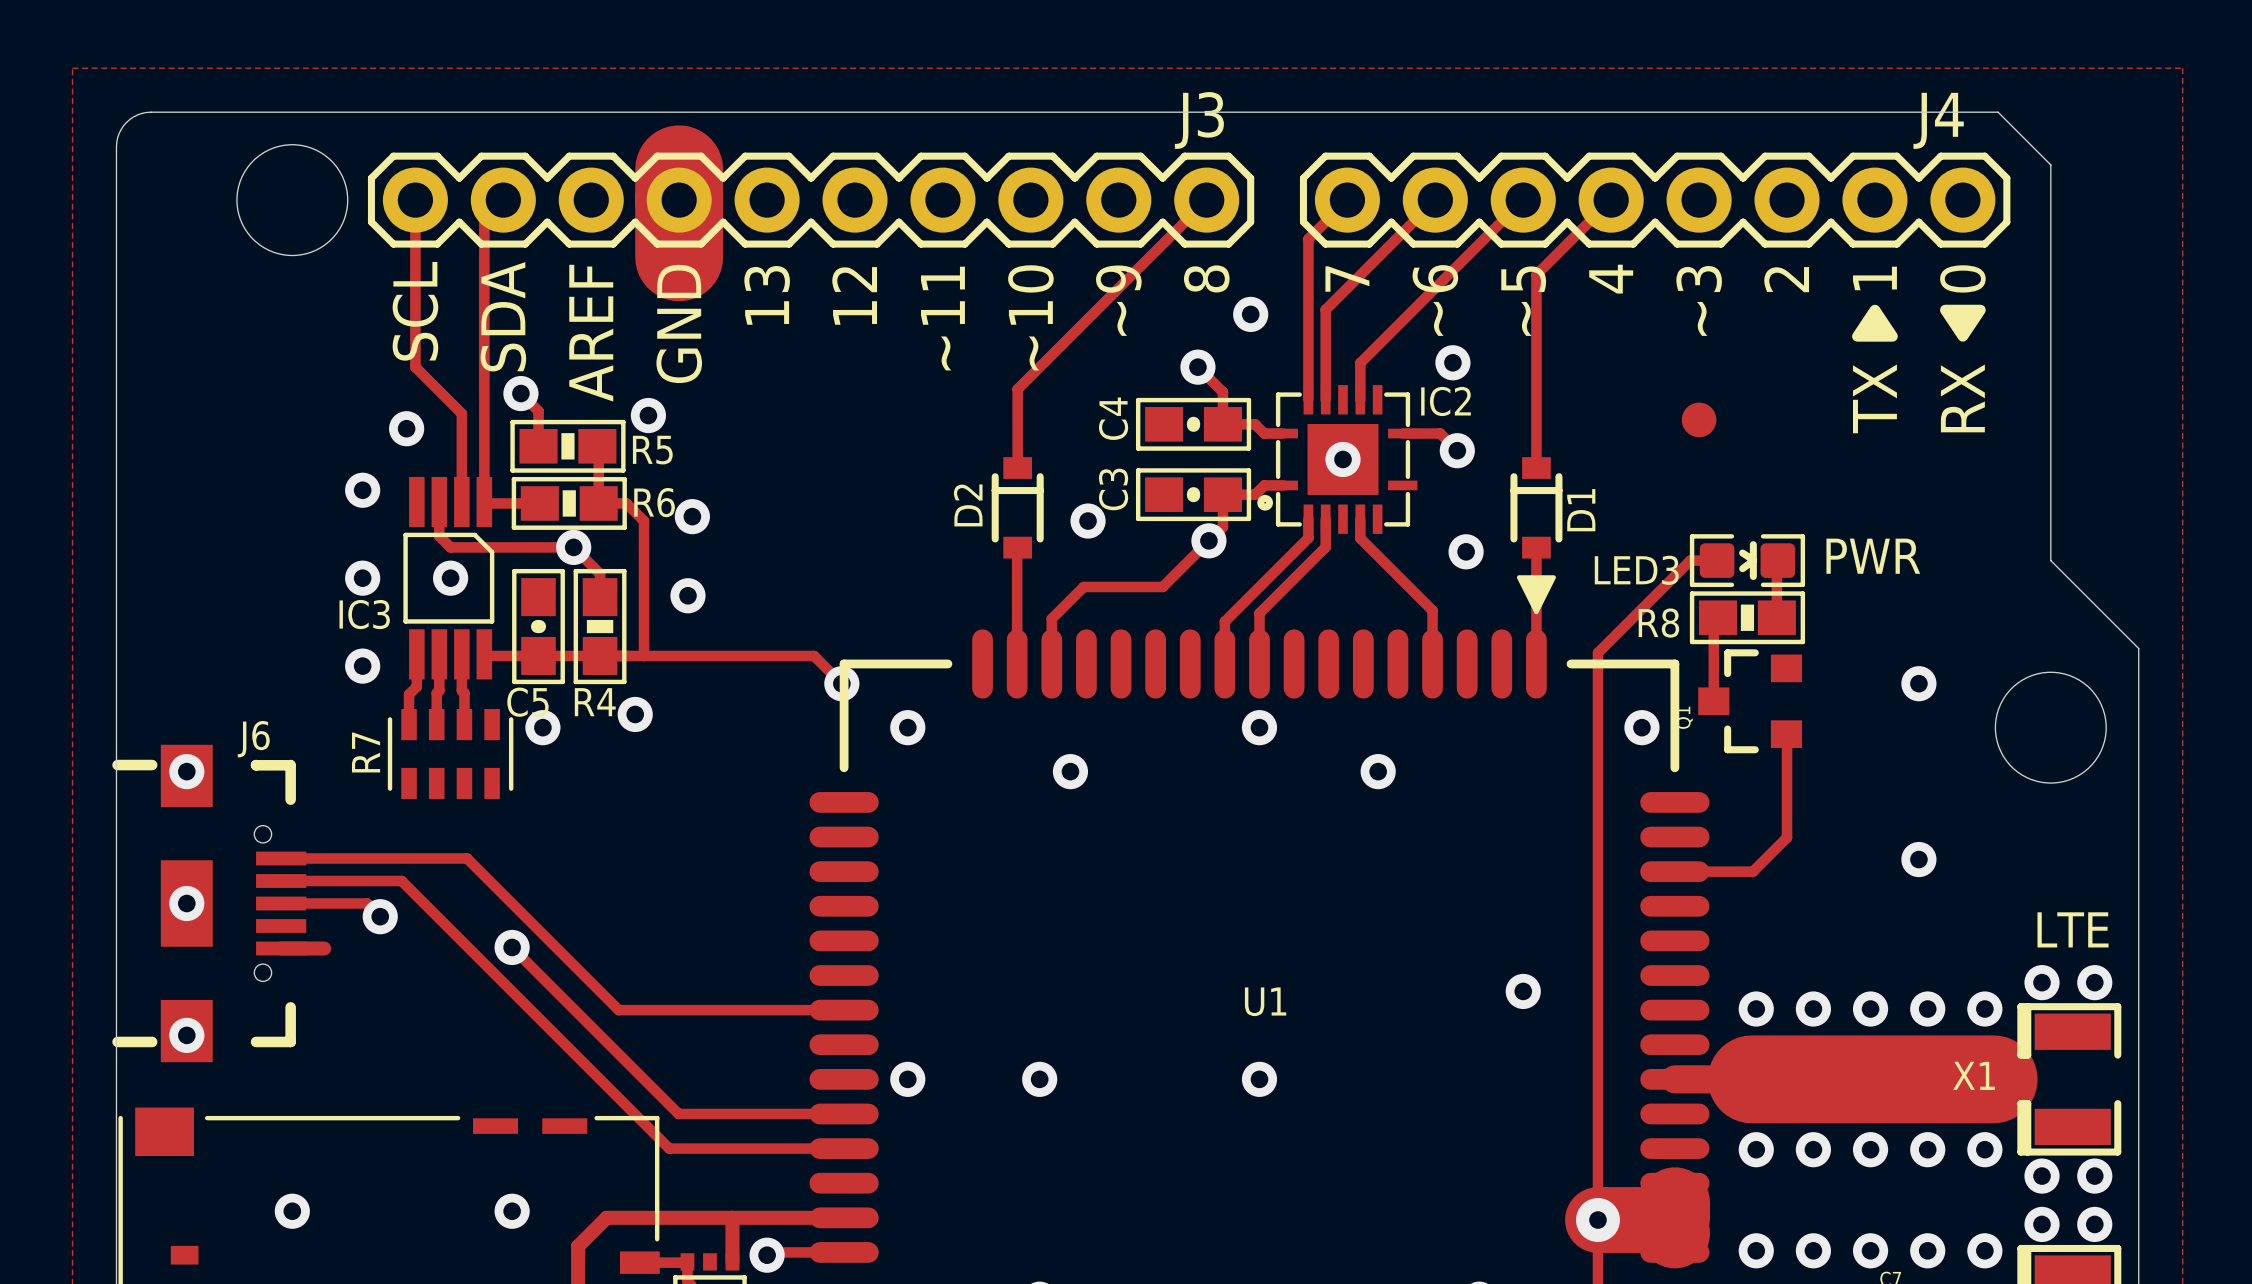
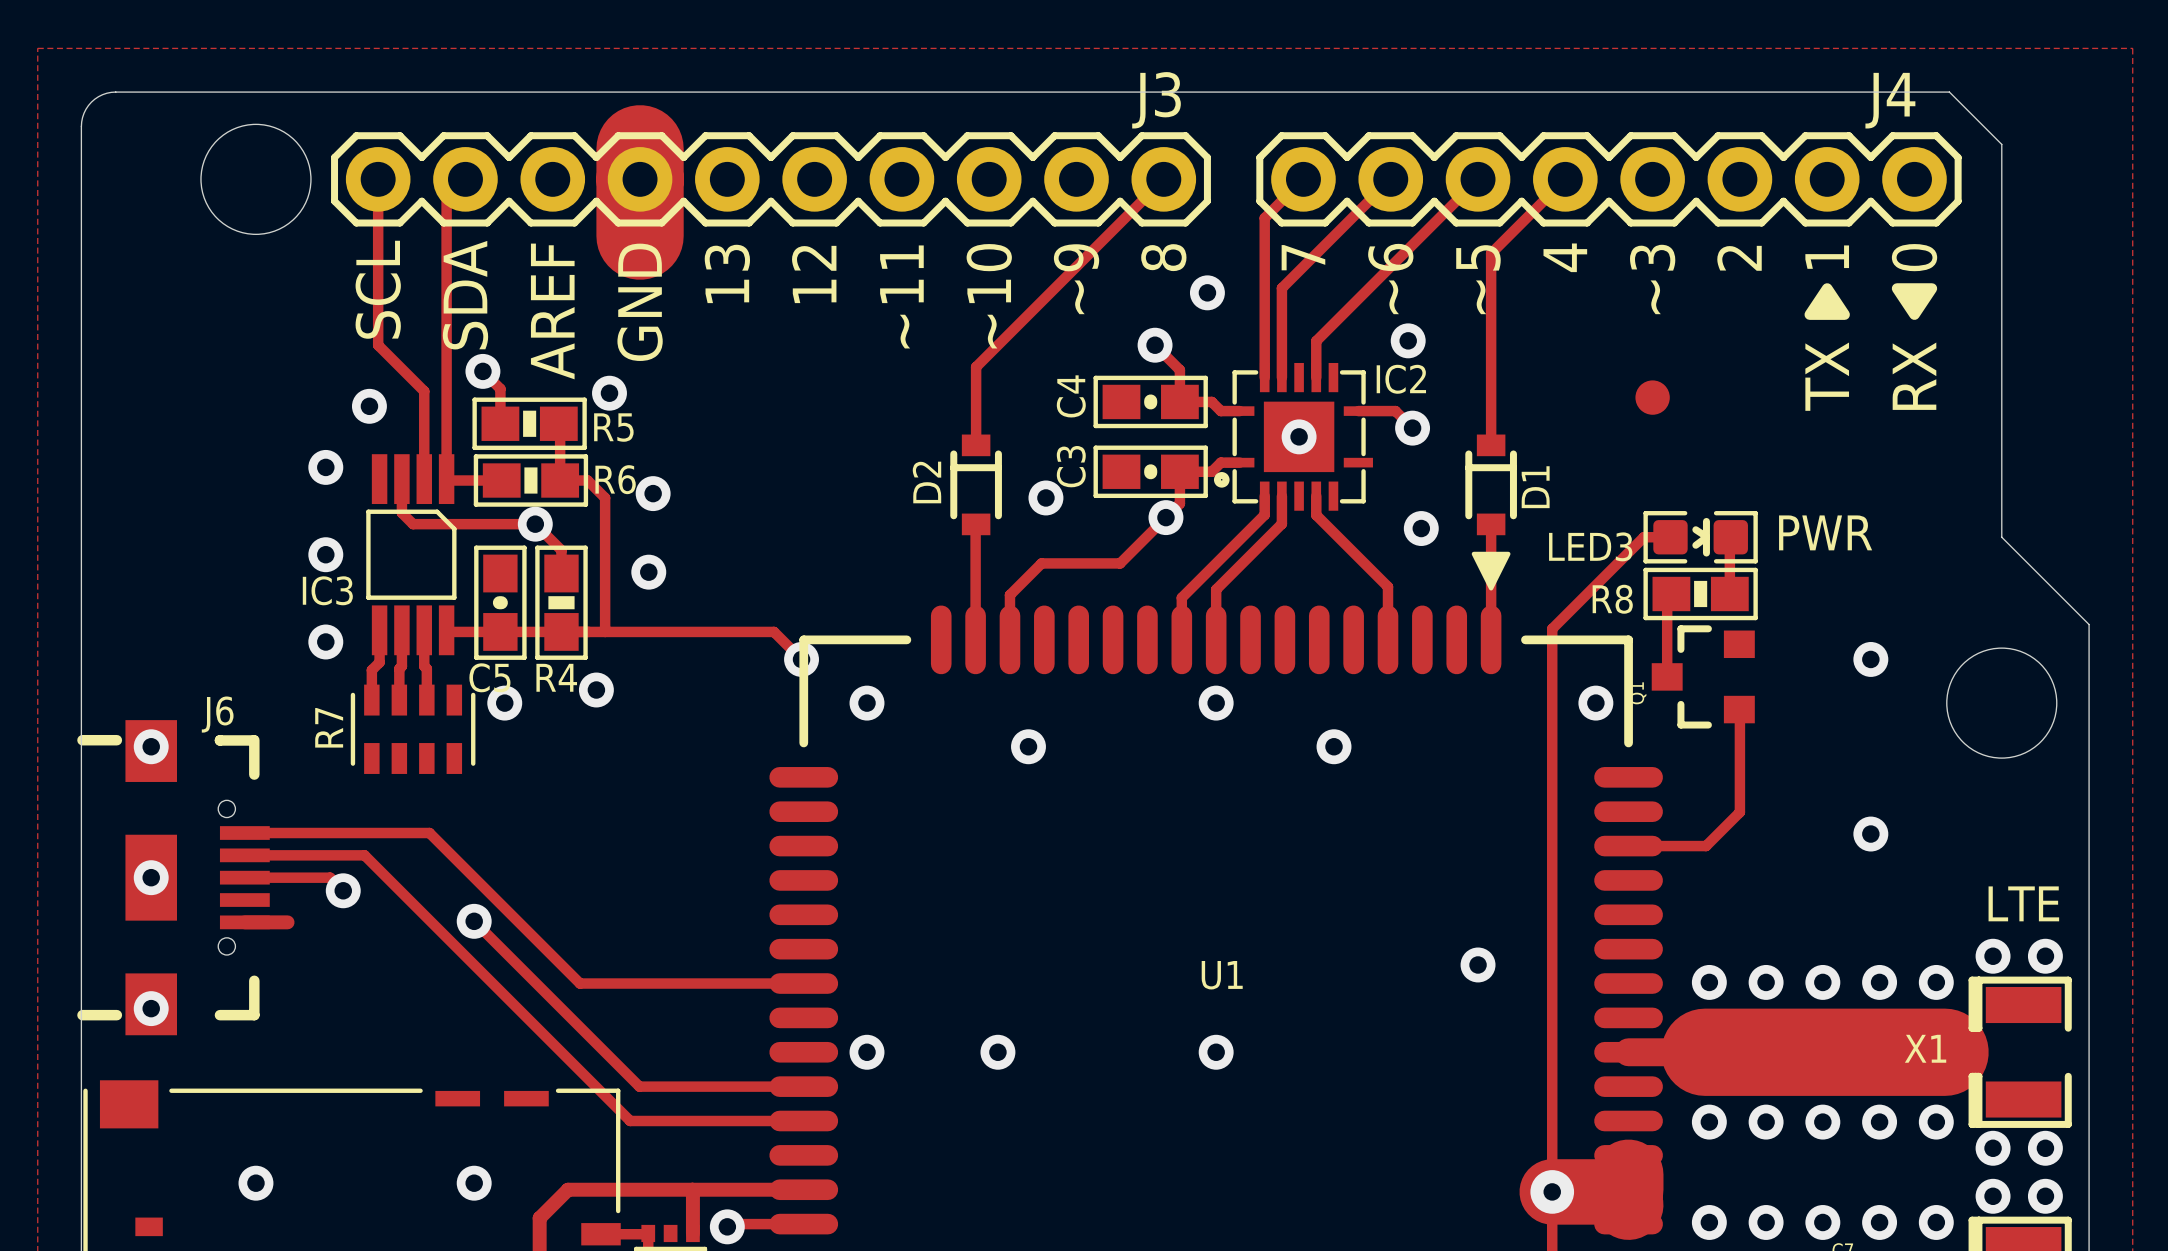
via: (450, 578) -> none

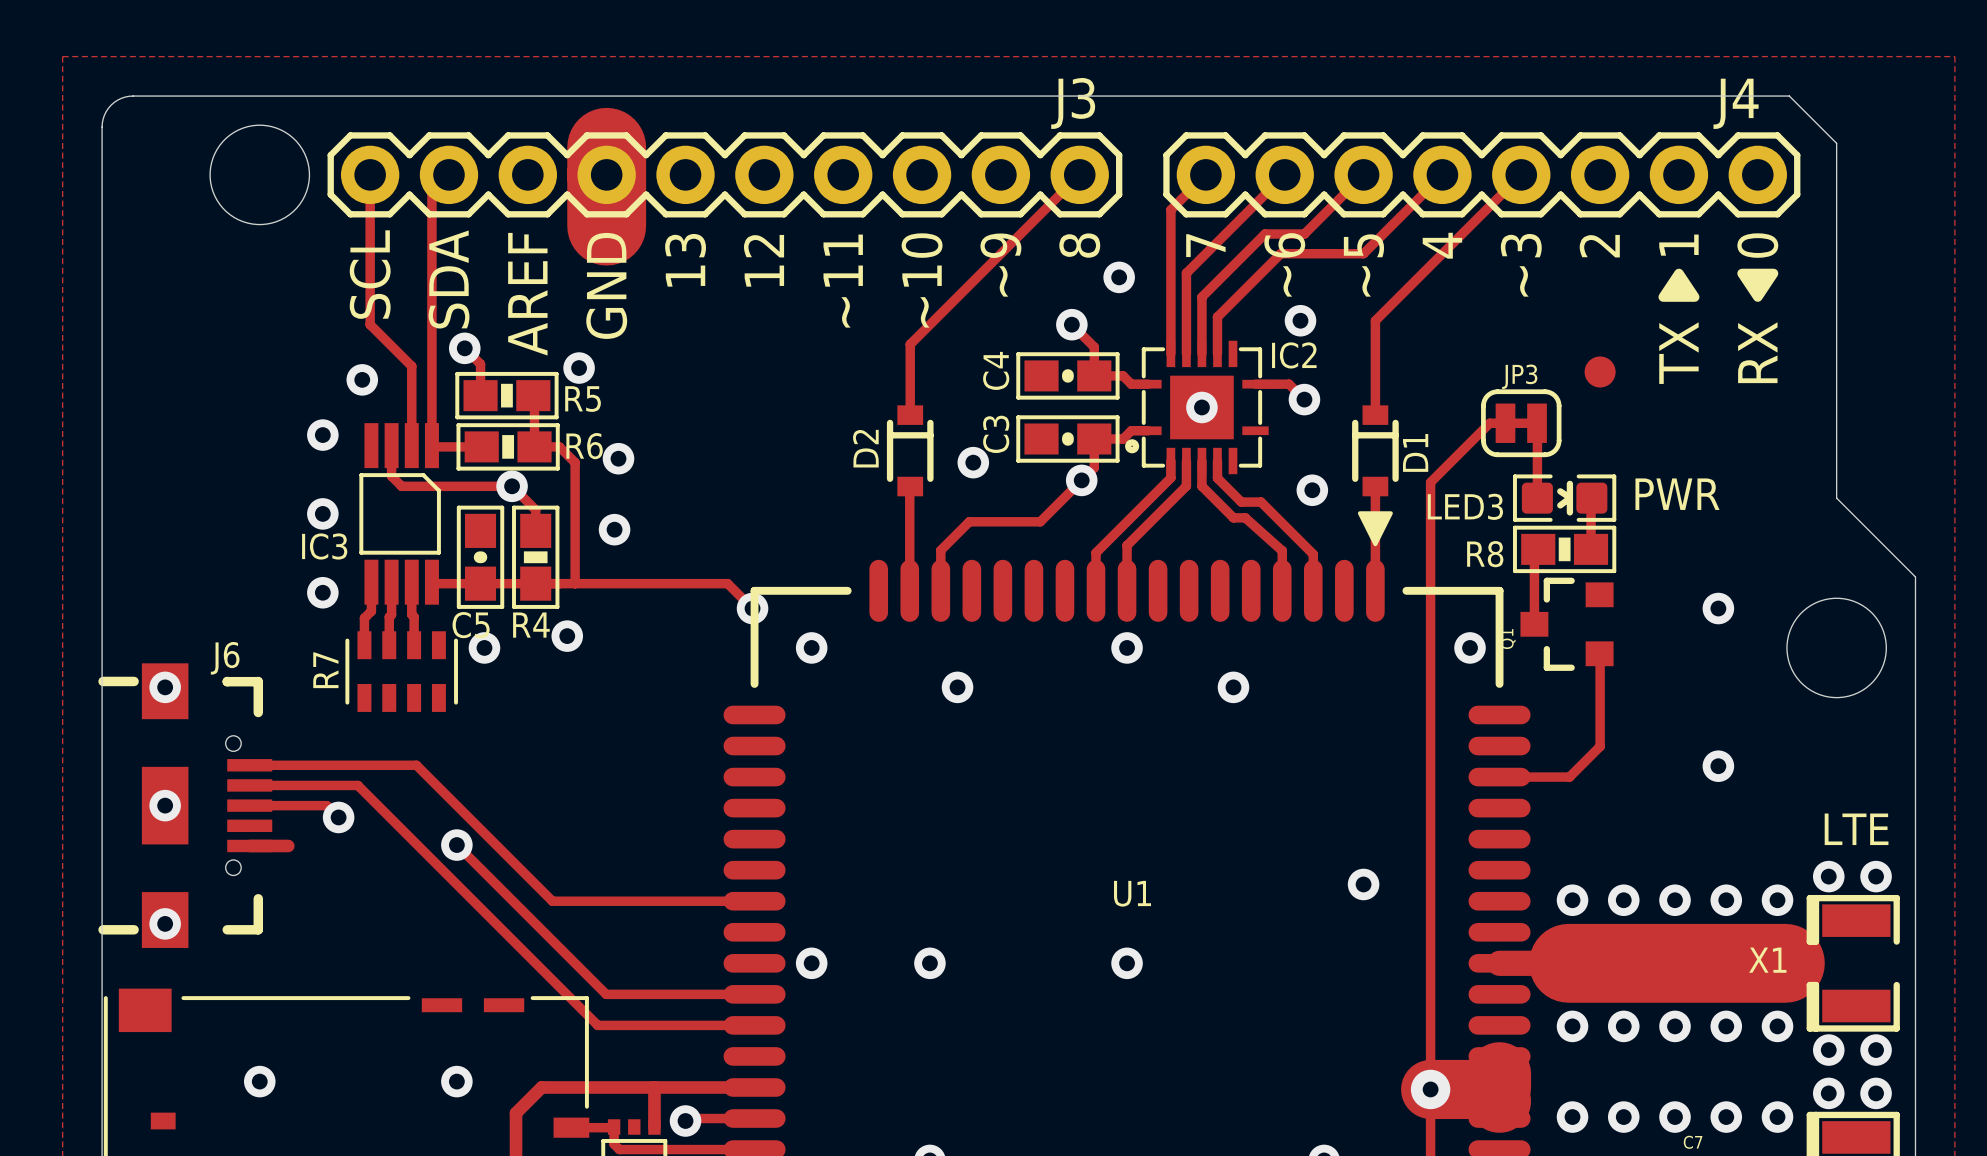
track: none -> (1521, 174) (1375, 320)
track: (1412, 244) (1316, 341) -> (1304, 234) (1265, 234) (1201, 297) (1201, 353)
track: (1491, 253) (1491, 340) -> (1375, 241) (1363, 253) (1280, 253) (1217, 317) (1217, 320)
part position: (1652, 397) -> (1600, 371)
JP3: none -> (1521, 423)
track: none -> (1537, 423) (1537, 498)
track: none -> (1201, 461) (1201, 486) (1233, 517) (1245, 517) (1282, 550)
track: (1670, 537) (1643, 537) (1552, 628) -> (1537, 423) (1489, 423) (1430, 482) (1430, 580)
track: (1342, 541) (1388, 586) (1388, 595) -> (1241, 502) (1261, 502) (1313, 554) (1313, 590)

